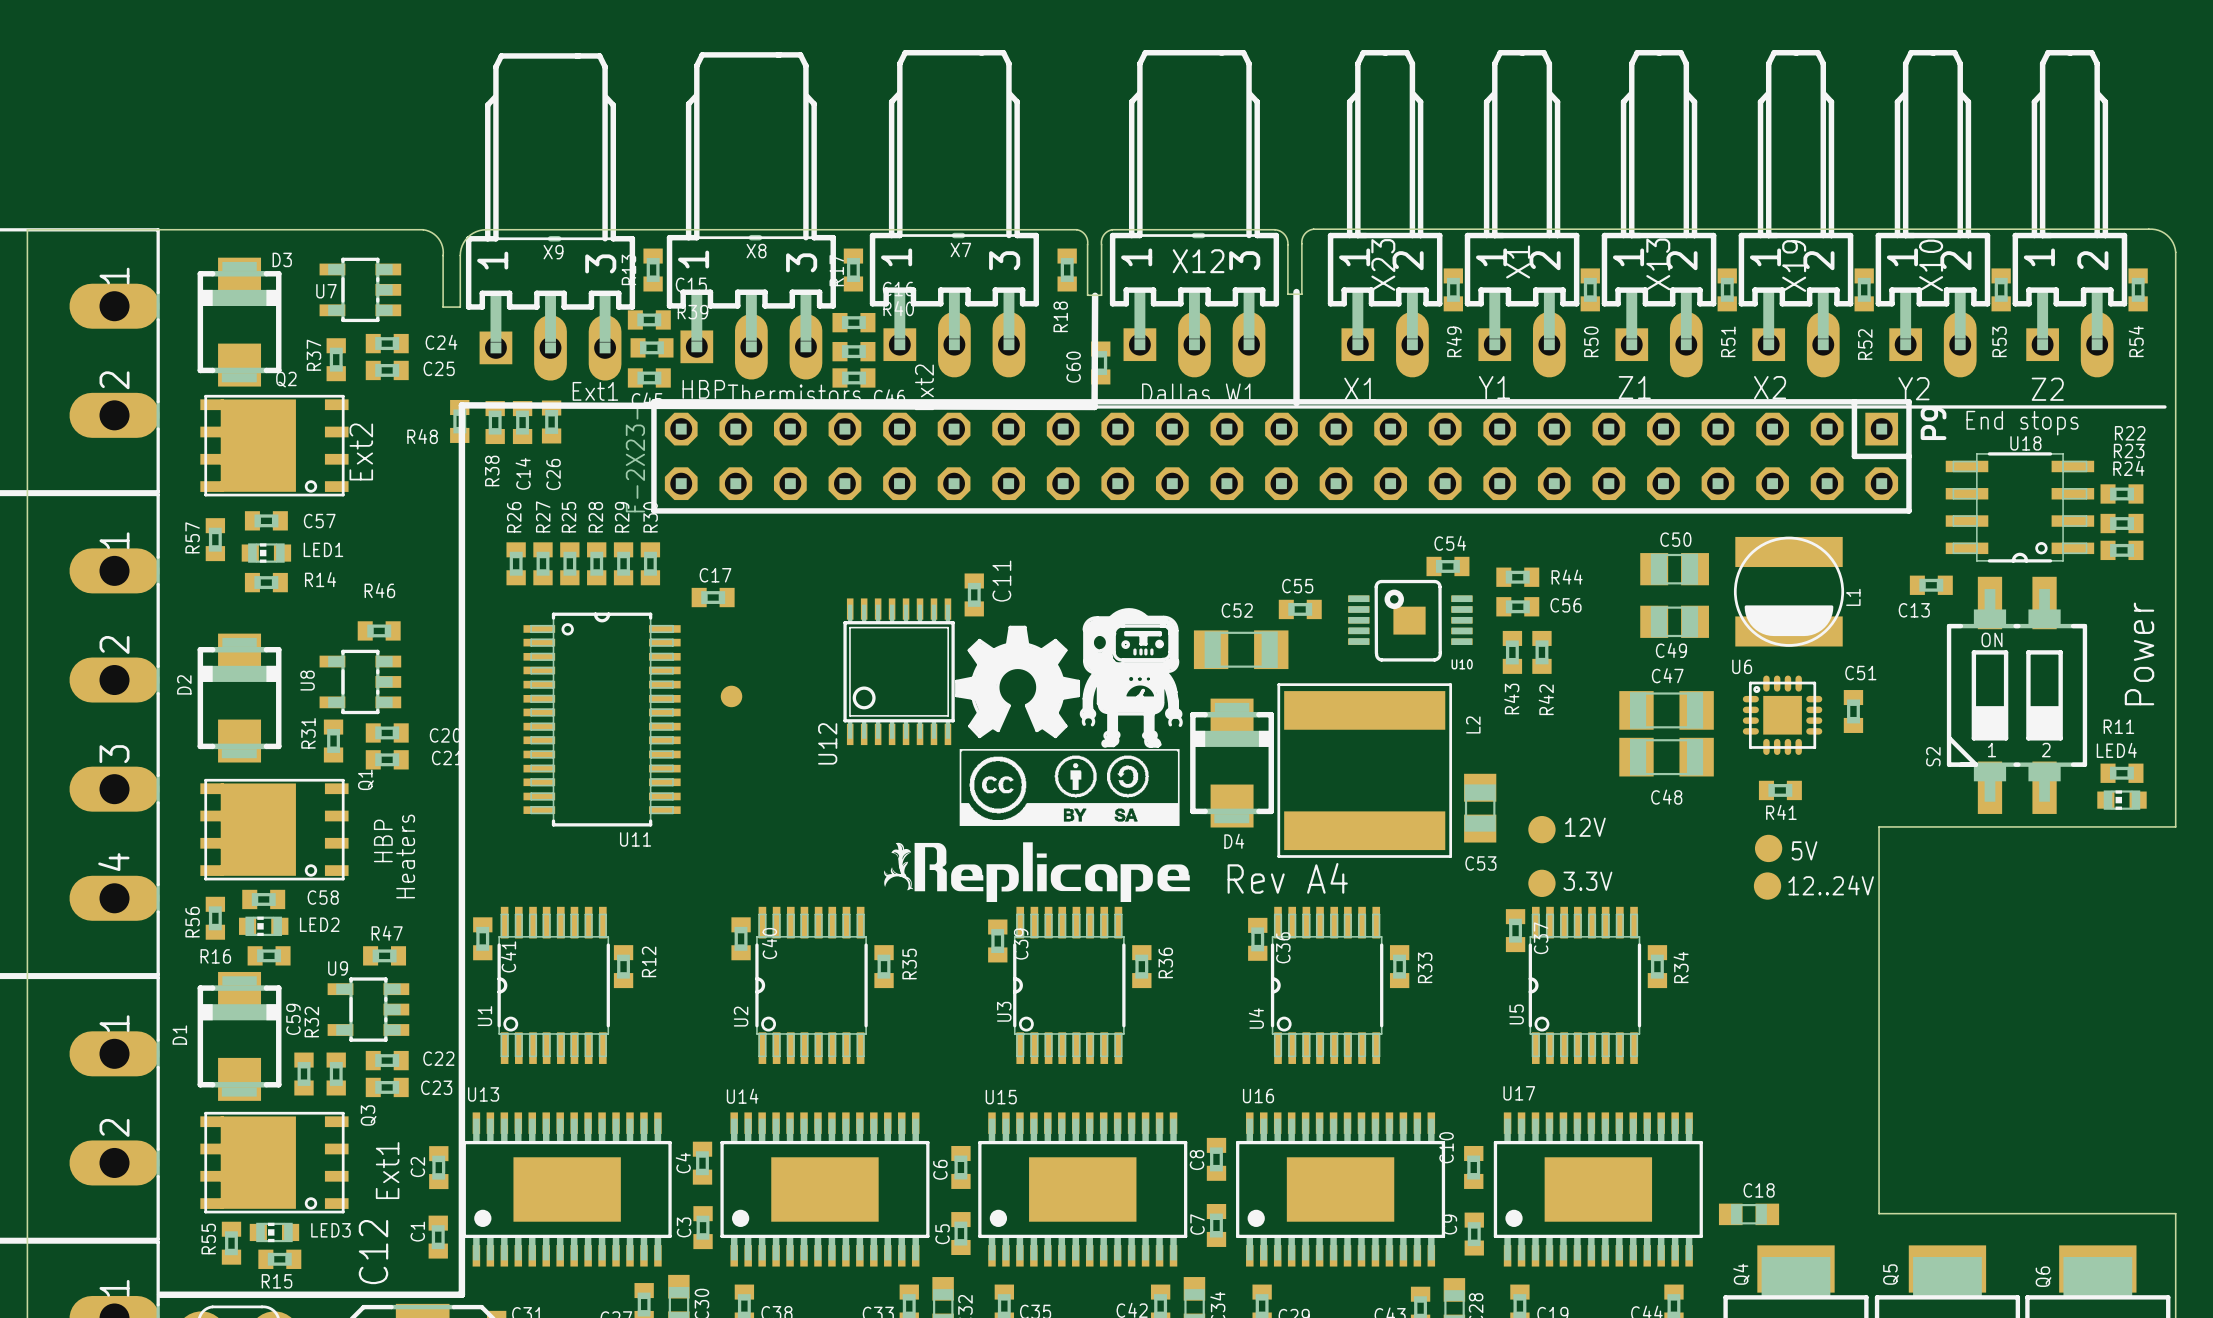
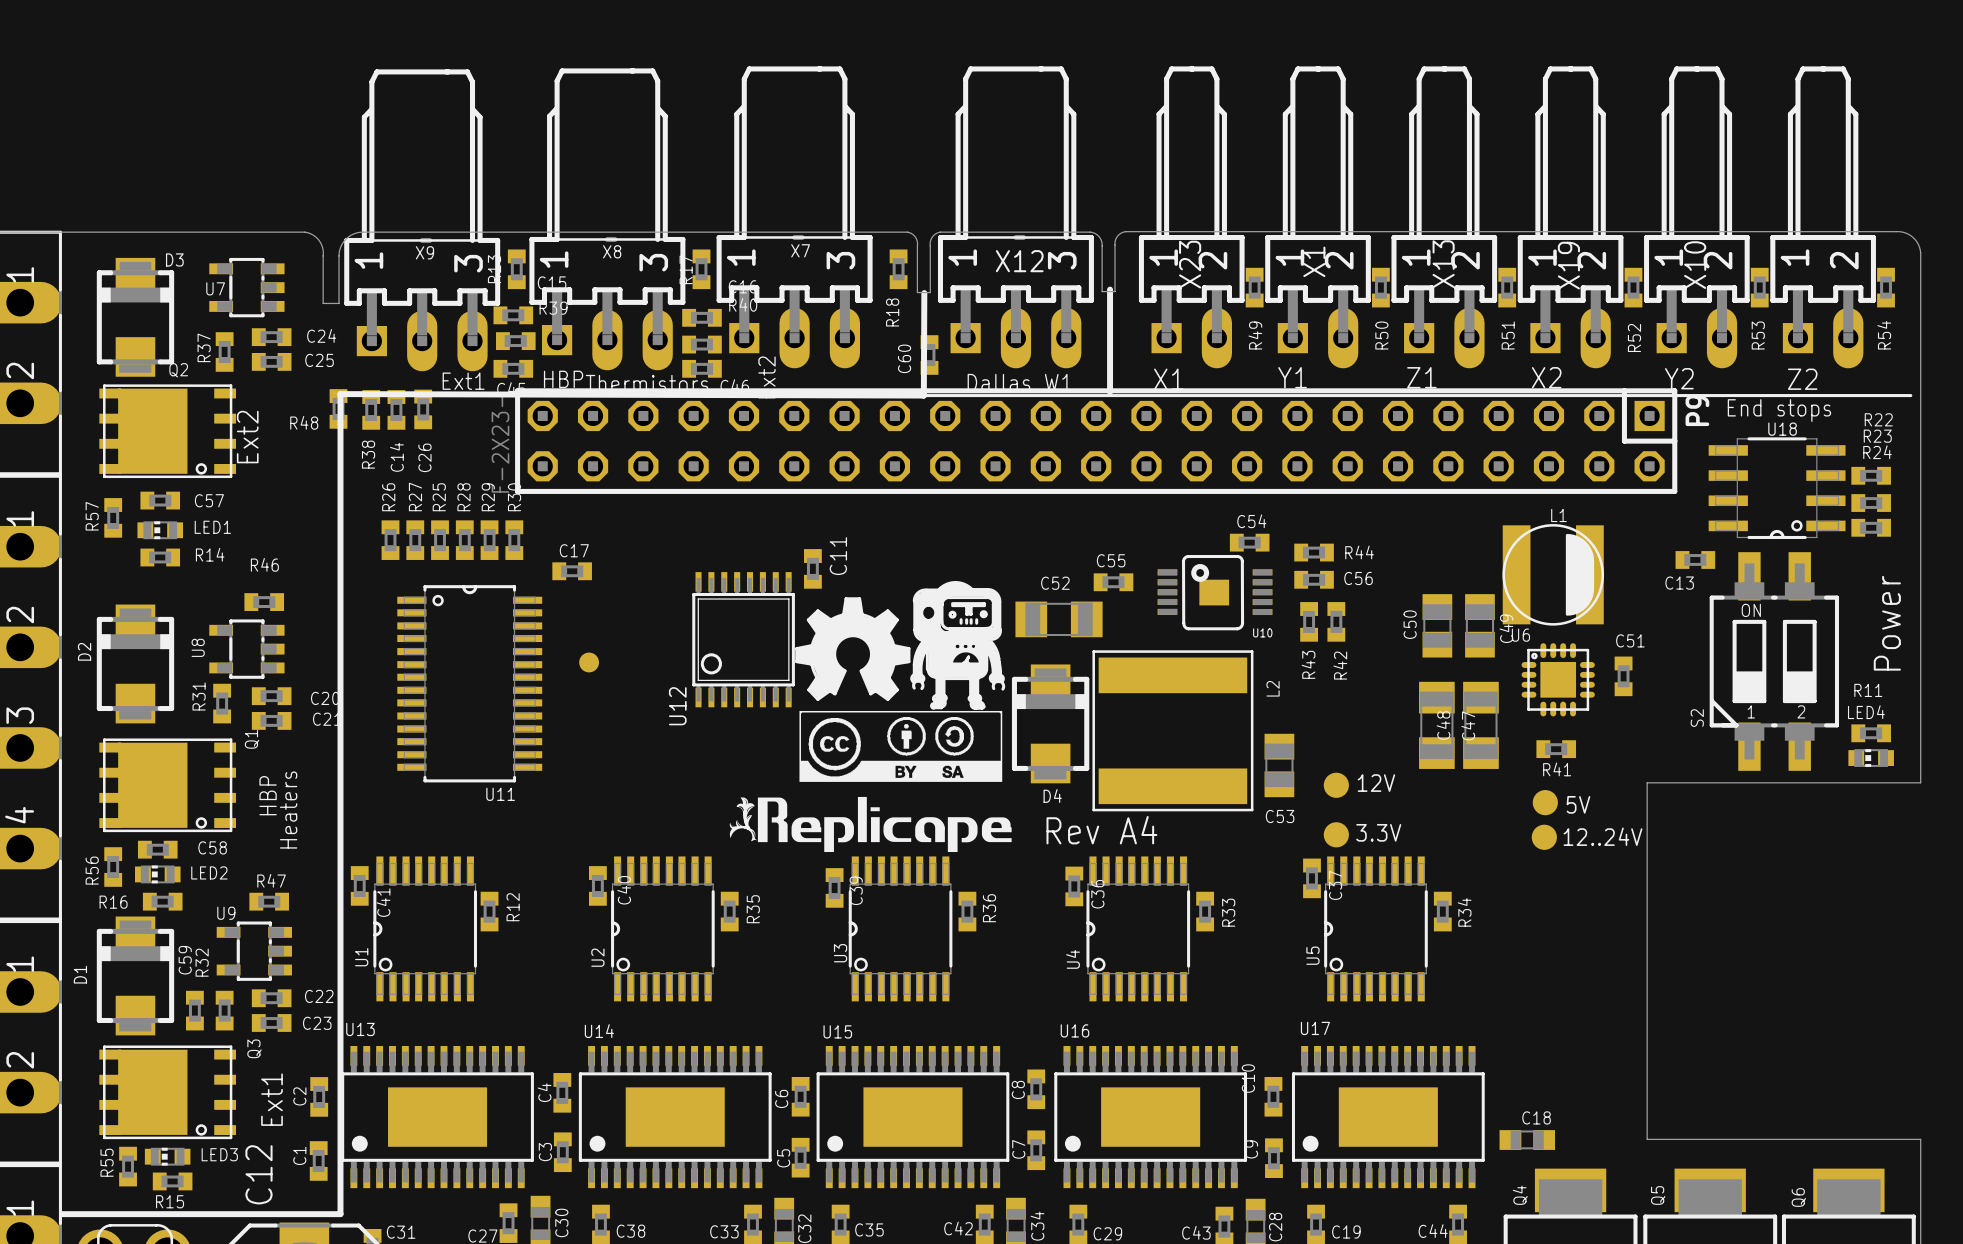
C50 rotation: 0° (1674, 569) -> 90° clockwise (1437, 625)
C50 position: (1674, 569) -> (1437, 625)
L1 rotation: 0° (1789, 591) -> 90° counterclockwise (1553, 574)
C49 rotation: 0° (1674, 621) -> 90° clockwise (1479, 625)
C49 position: (1674, 621) -> (1479, 625)
C47 rotation: 0° (1666, 710) -> 90° clockwise (1436, 725)
C48 rotation: 0° (1666, 757) -> 90° clockwise (1480, 725)

